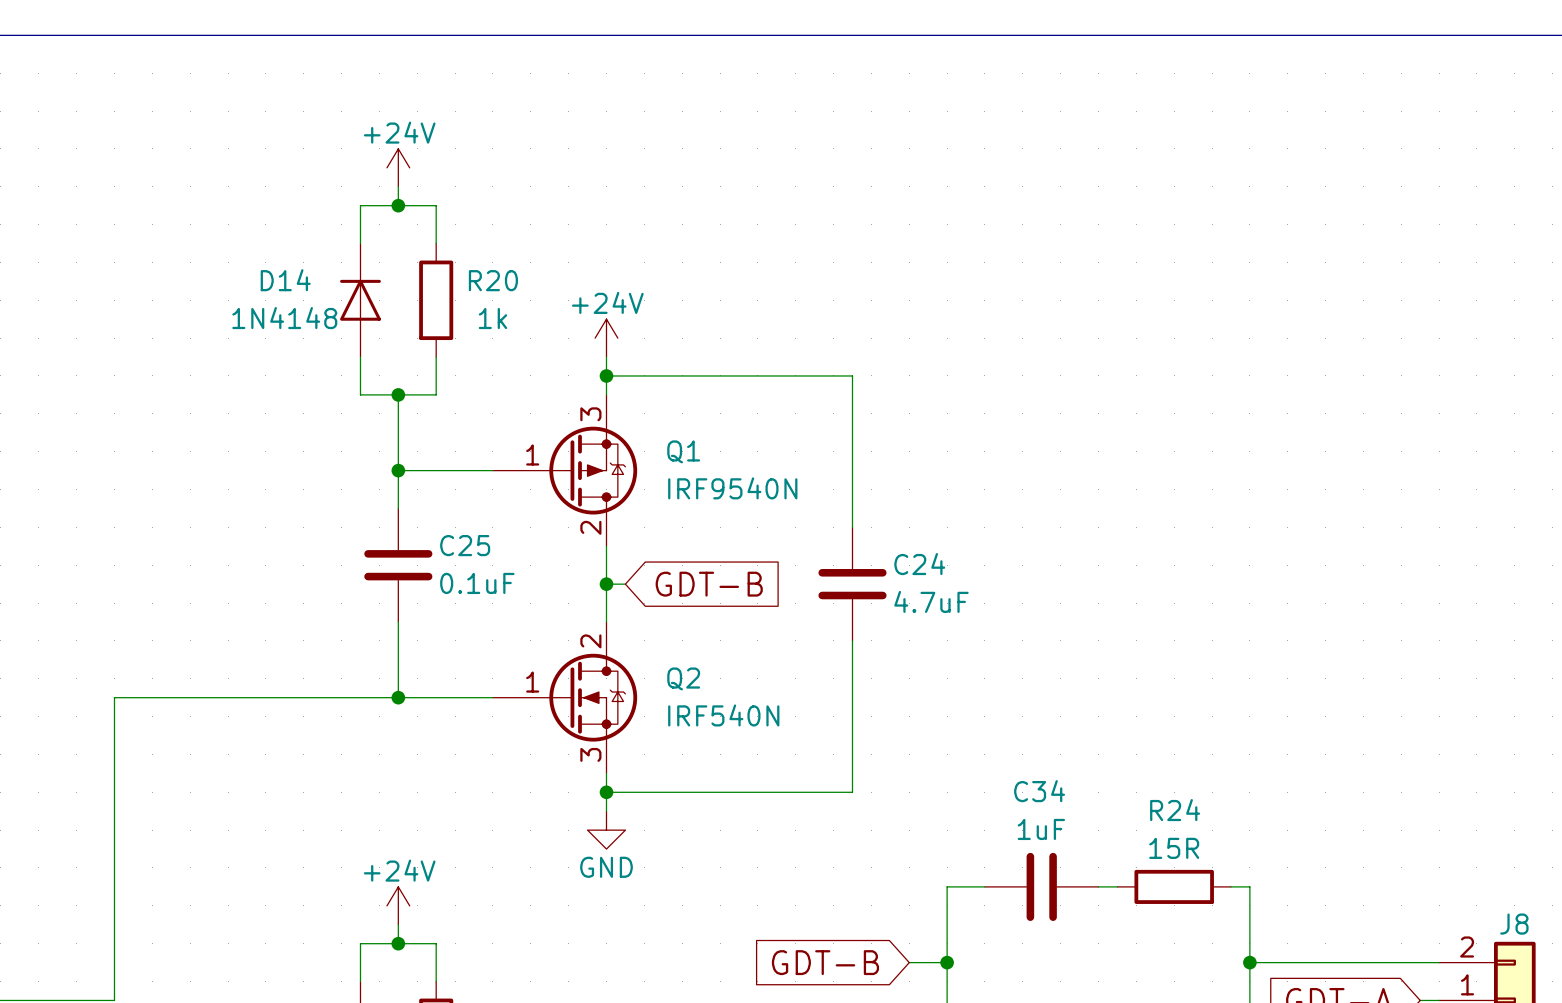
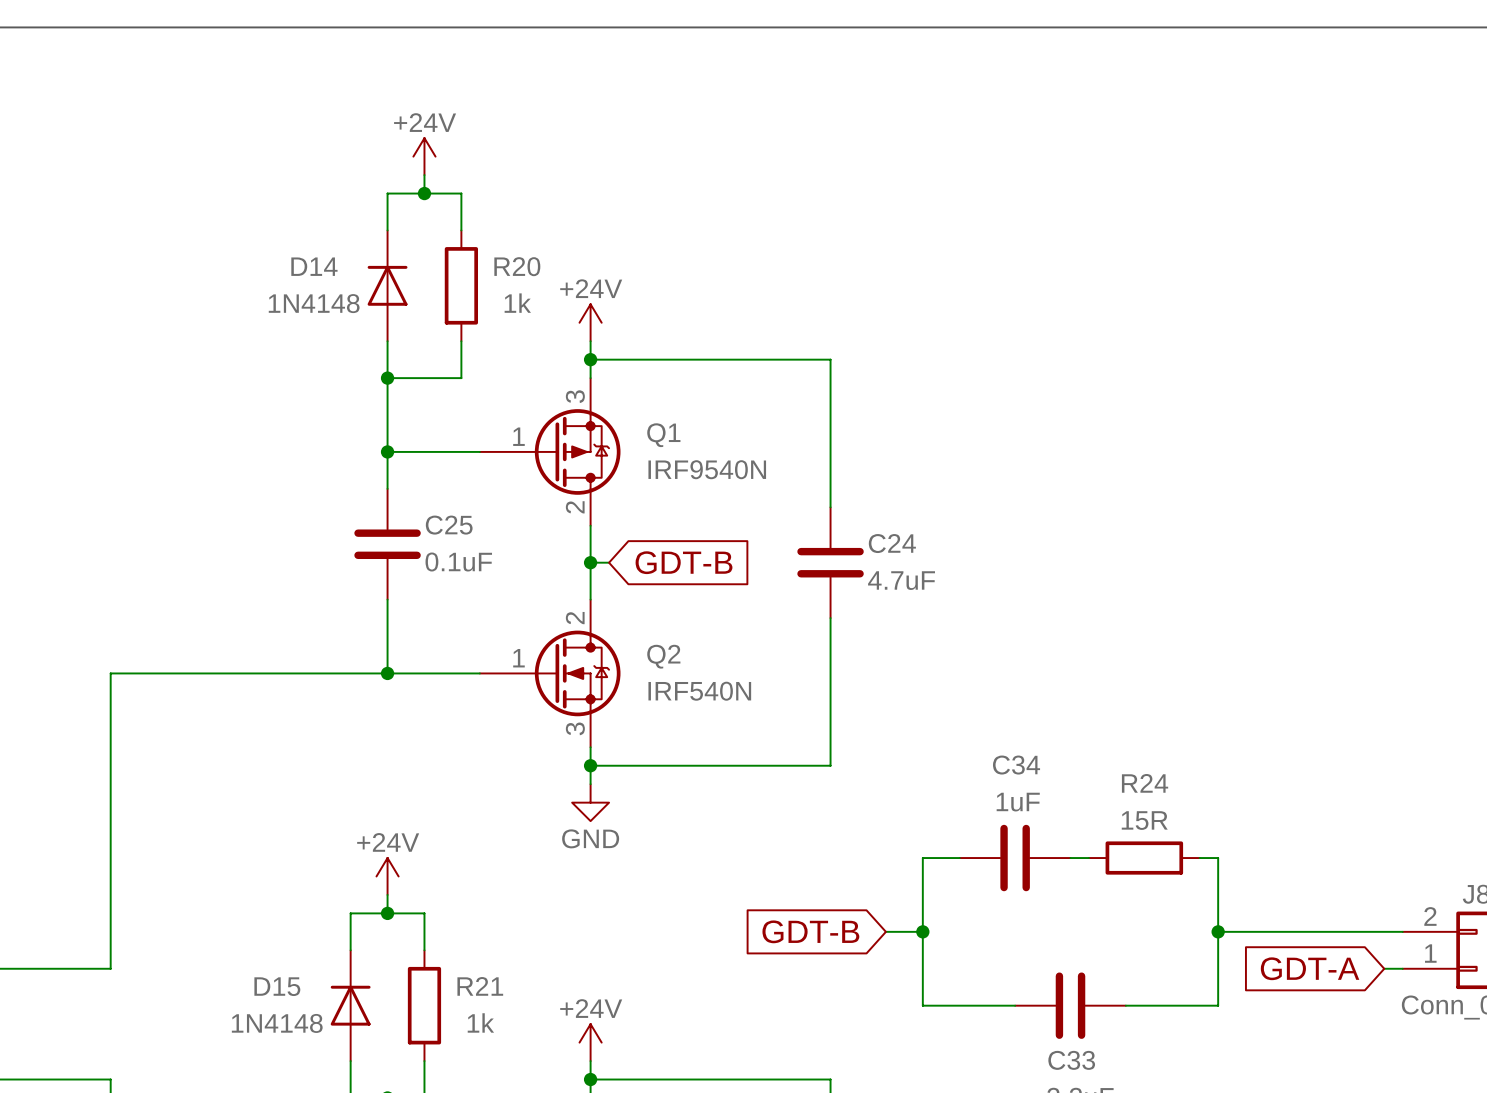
power symbol position: +24V (398, 167) -> +24V (424, 156)
wire: (398, 186) (398, 205) (360, 205) (360, 243) -> none
wire: none -> (424, 175) (424, 193) (461, 193) (461, 230)
junction position: (398, 205) -> (424, 193)
wire: (436, 205) (436, 243) -> (387, 193) (387, 230)
D14 position: (360, 300) -> (387, 285)
R20 position: (436, 300) -> (461, 285)
wire: (360, 357) (360, 394) (398, 394) -> (387, 341) (387, 378)
wire: (436, 357) (436, 394) -> (461, 341) (461, 378) (424, 378)

